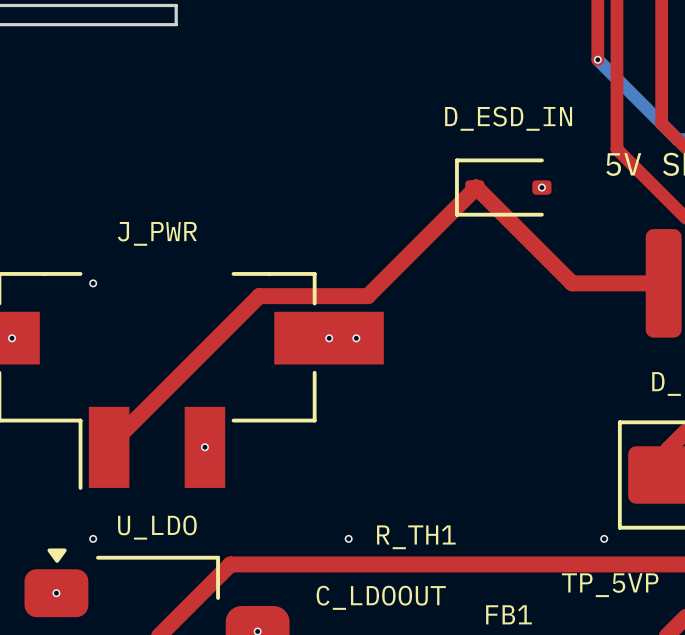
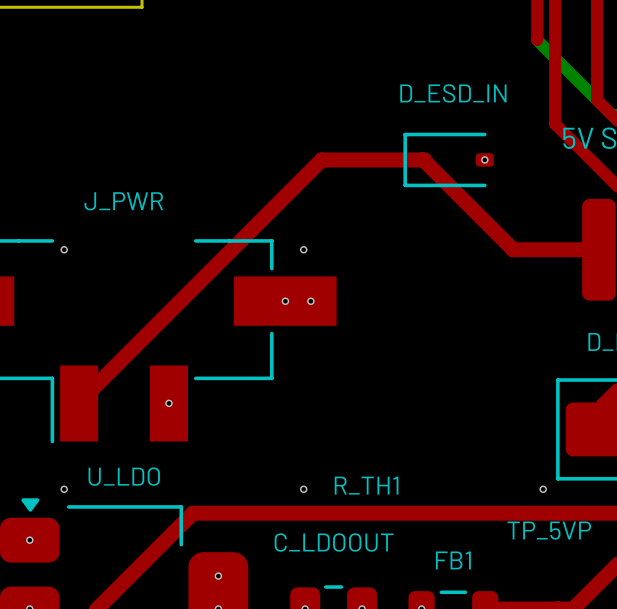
via: (597, 59) -> none
top track: (476, 187) (367, 296) (259, 296) -> (421, 159) (321, 159) (219, 261)
via: none -> (303, 249)

